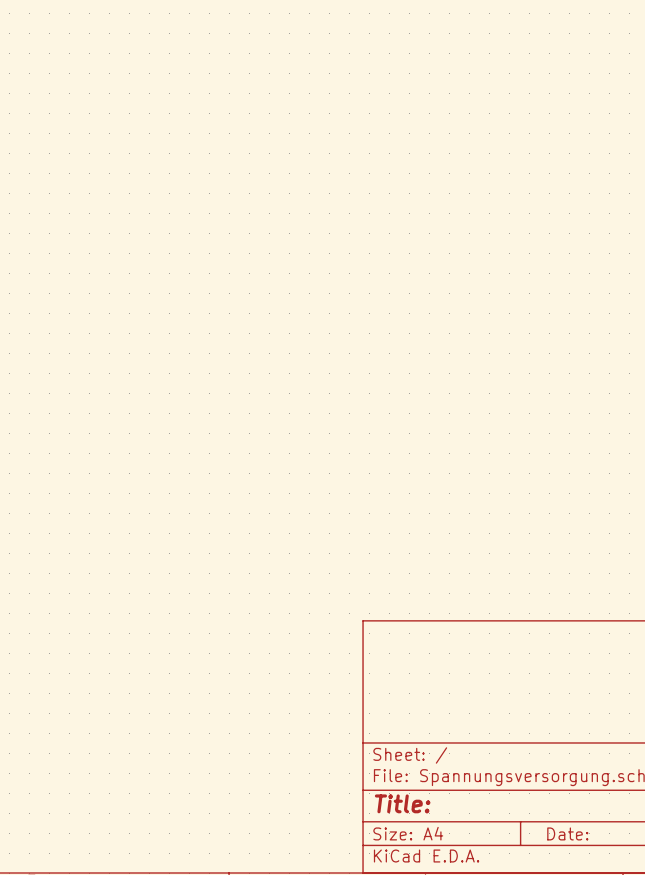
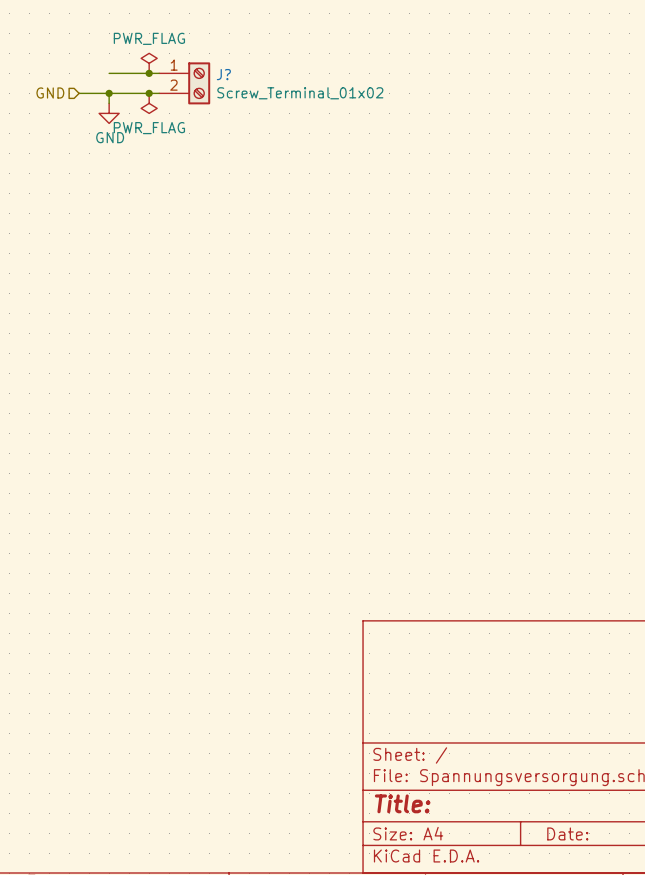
power symbol: none -> PWR_FLAG (149, 63)
wire: none -> (109, 73) (159, 73)
junction: none -> (149, 73)
J?: none -> Screw_Terminal_01x02 (184, 83)
hierarchical label: none -> GND (50, 93)
wire: none -> (79, 93) (159, 93)
wire: none -> (109, 93) (109, 103)
junction: none -> (109, 93)
junction: none -> (149, 93)
power symbol: none -> PWR_FLAG (149, 103)
power symbol: none -> GND (109, 113)

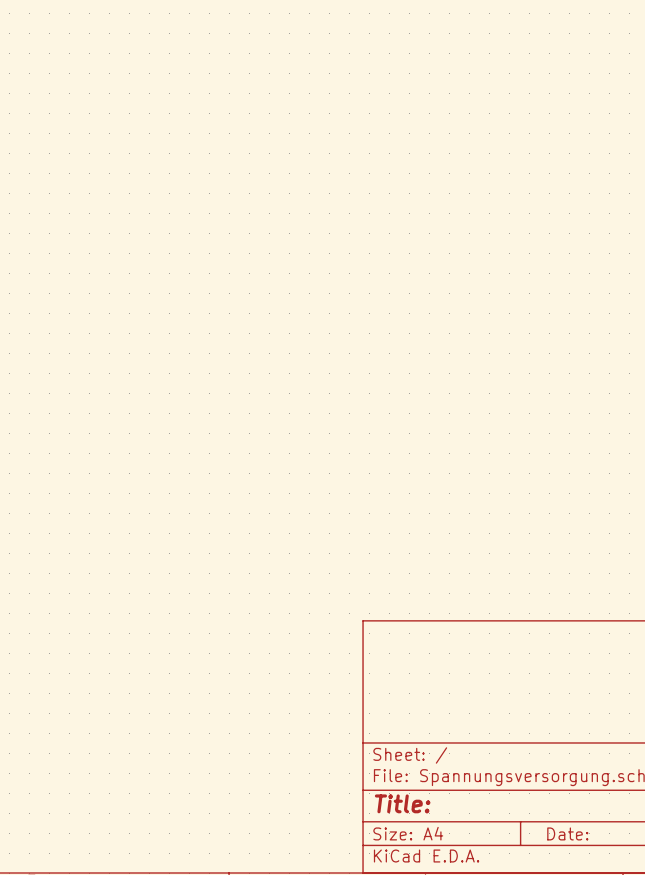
power symbol: PWR_FLAG (149, 63) -> none
wire: (109, 73) (159, 73) -> none
junction: (149, 73) -> none
J?: Screw_Terminal_01x02 (184, 83) -> none
hierarchical label: GND (50, 93) -> none
wire: (79, 93) (159, 93) -> none
wire: (109, 93) (109, 103) -> none
junction: (109, 93) -> none
junction: (149, 93) -> none
power symbol: PWR_FLAG (149, 103) -> none
power symbol: GND (109, 113) -> none

